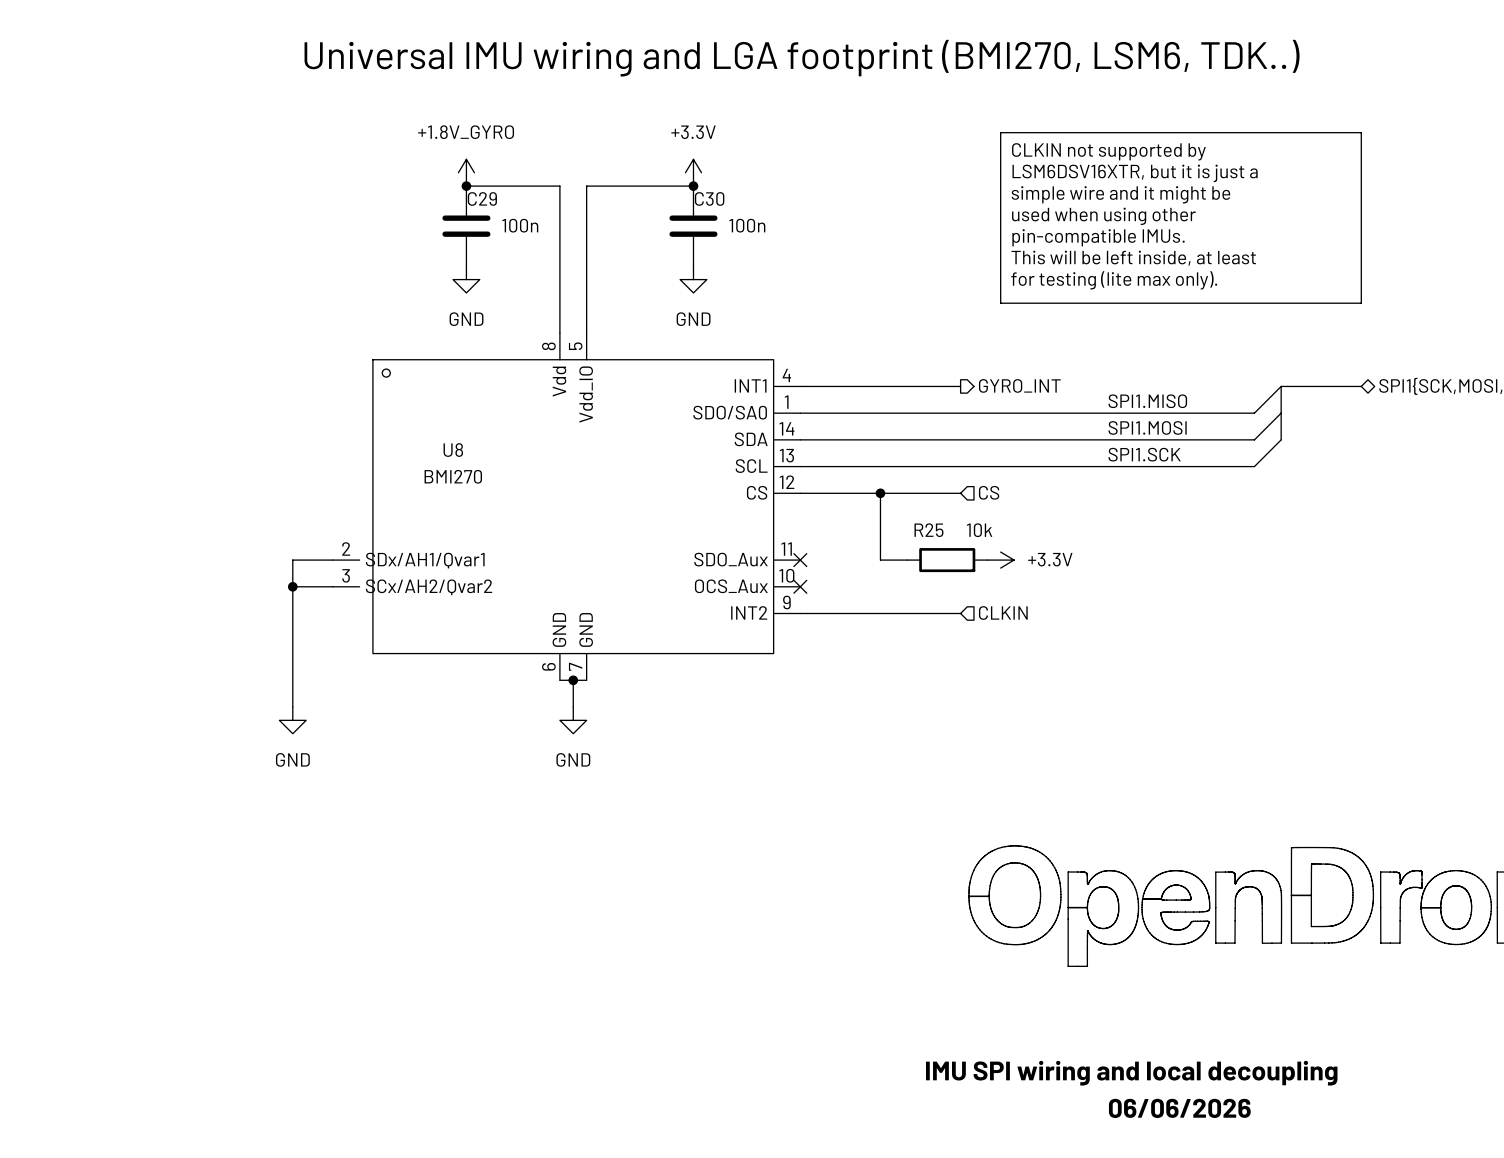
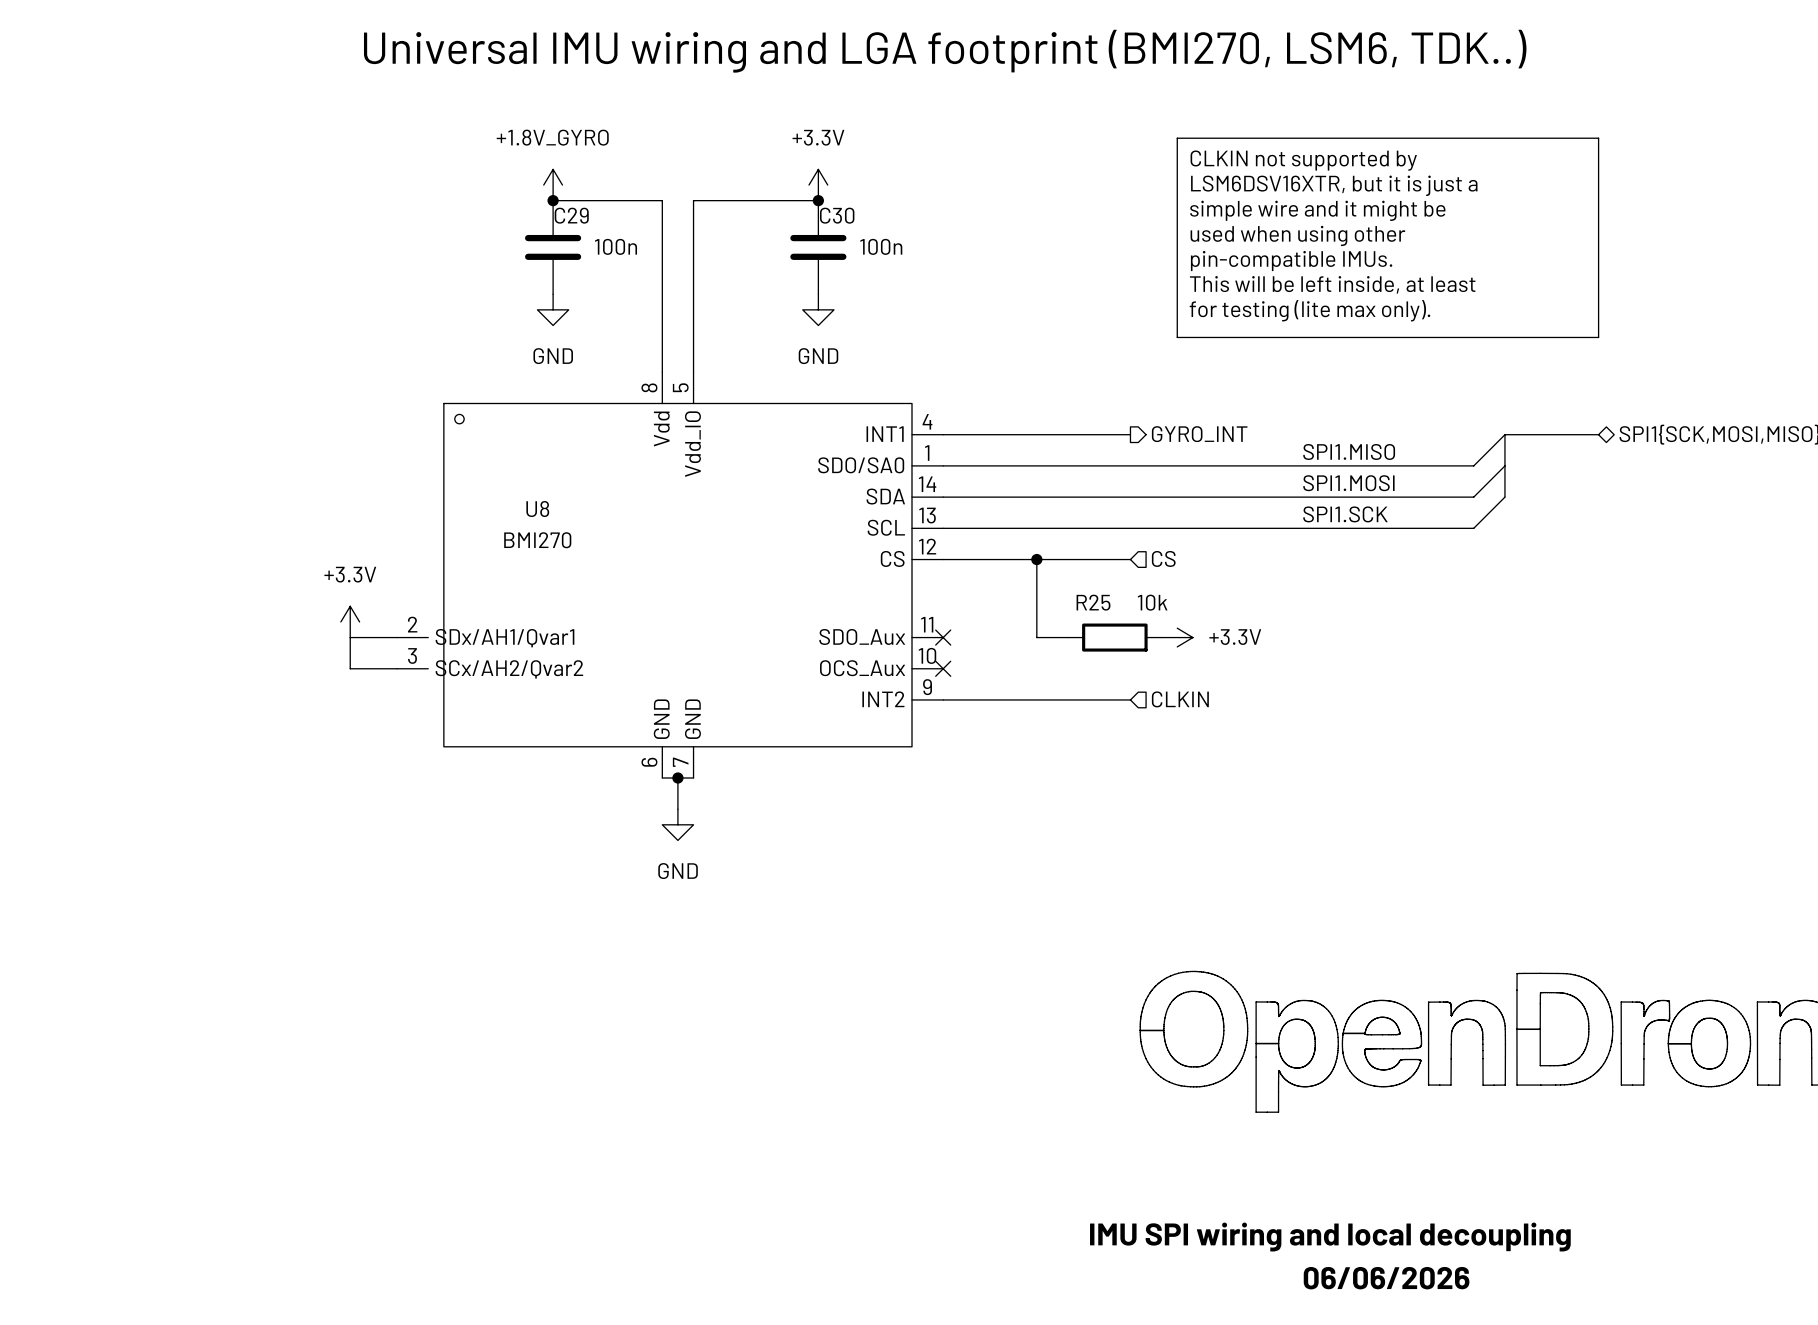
power symbol: none -> +3.3V (350, 621)
wire: (292, 586) (292, 707) -> none
junction: (292, 586) -> none
power symbol: GND (292, 720) -> none

